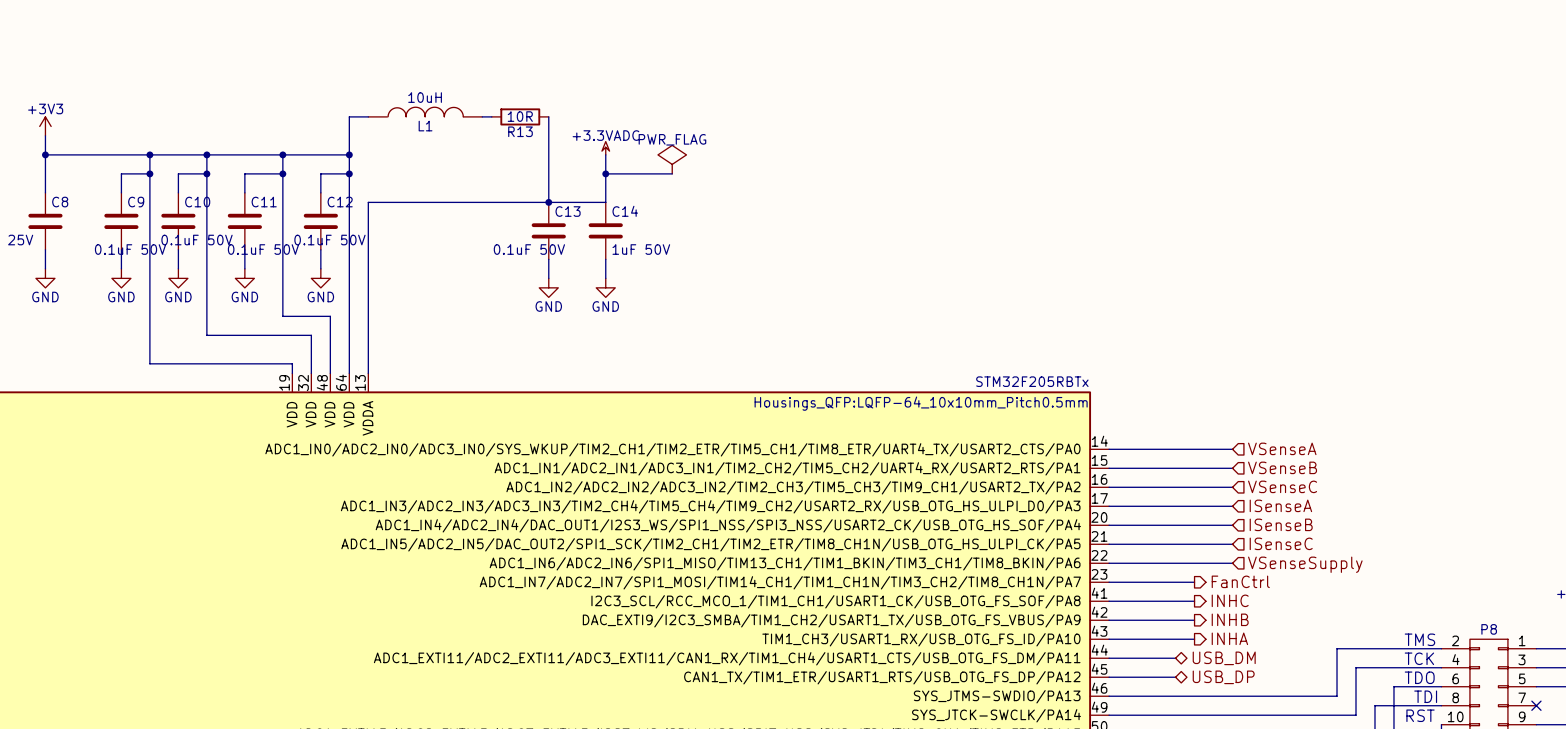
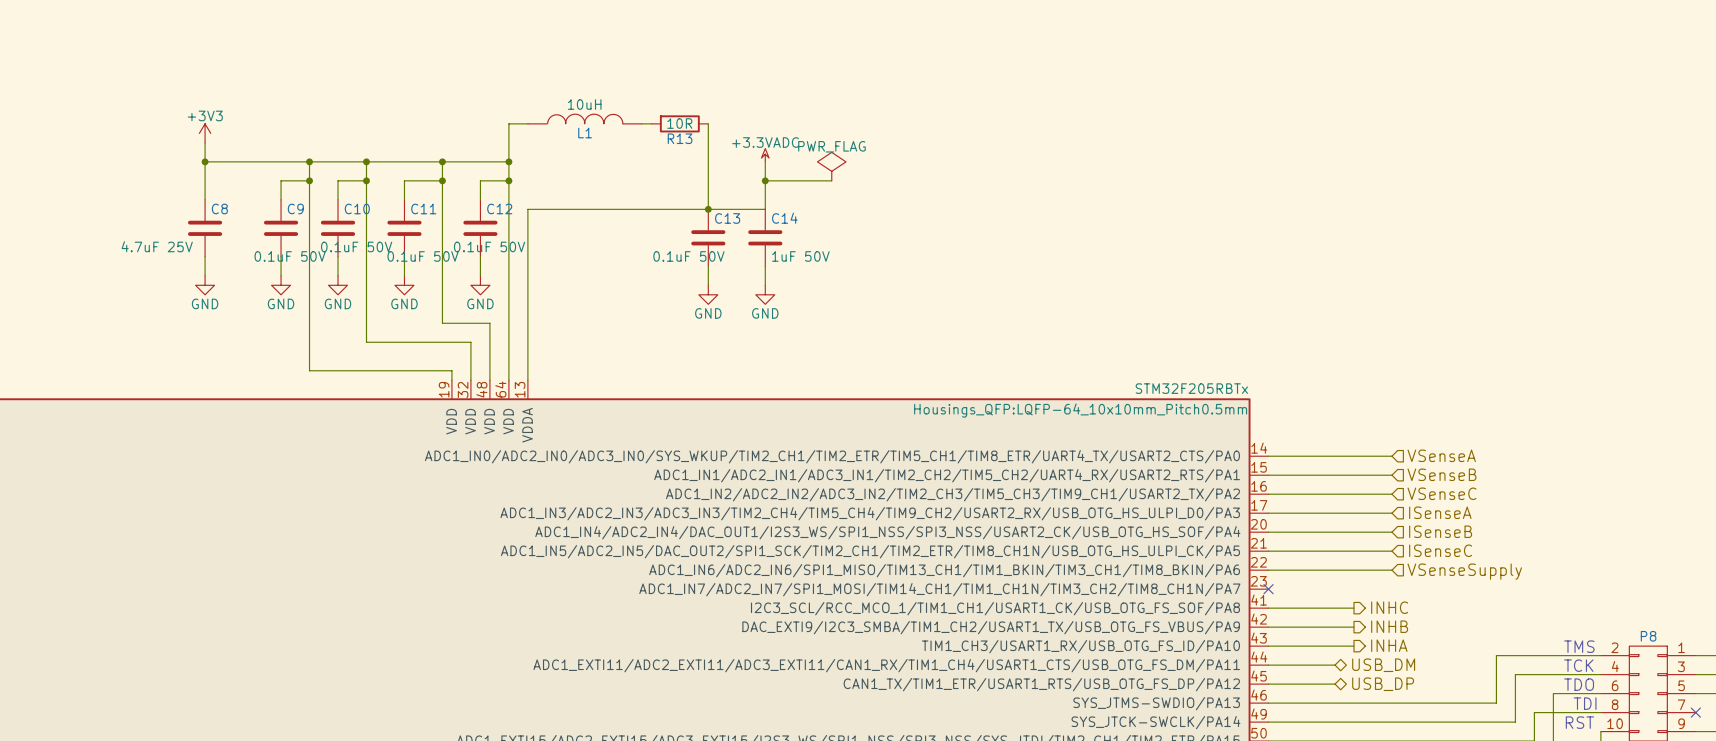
hierarchical label: FanCtrl (1240, 581) -> none
wire: (1109, 582) (1194, 582) -> none
no-connect mark: none -> (1268, 589)

